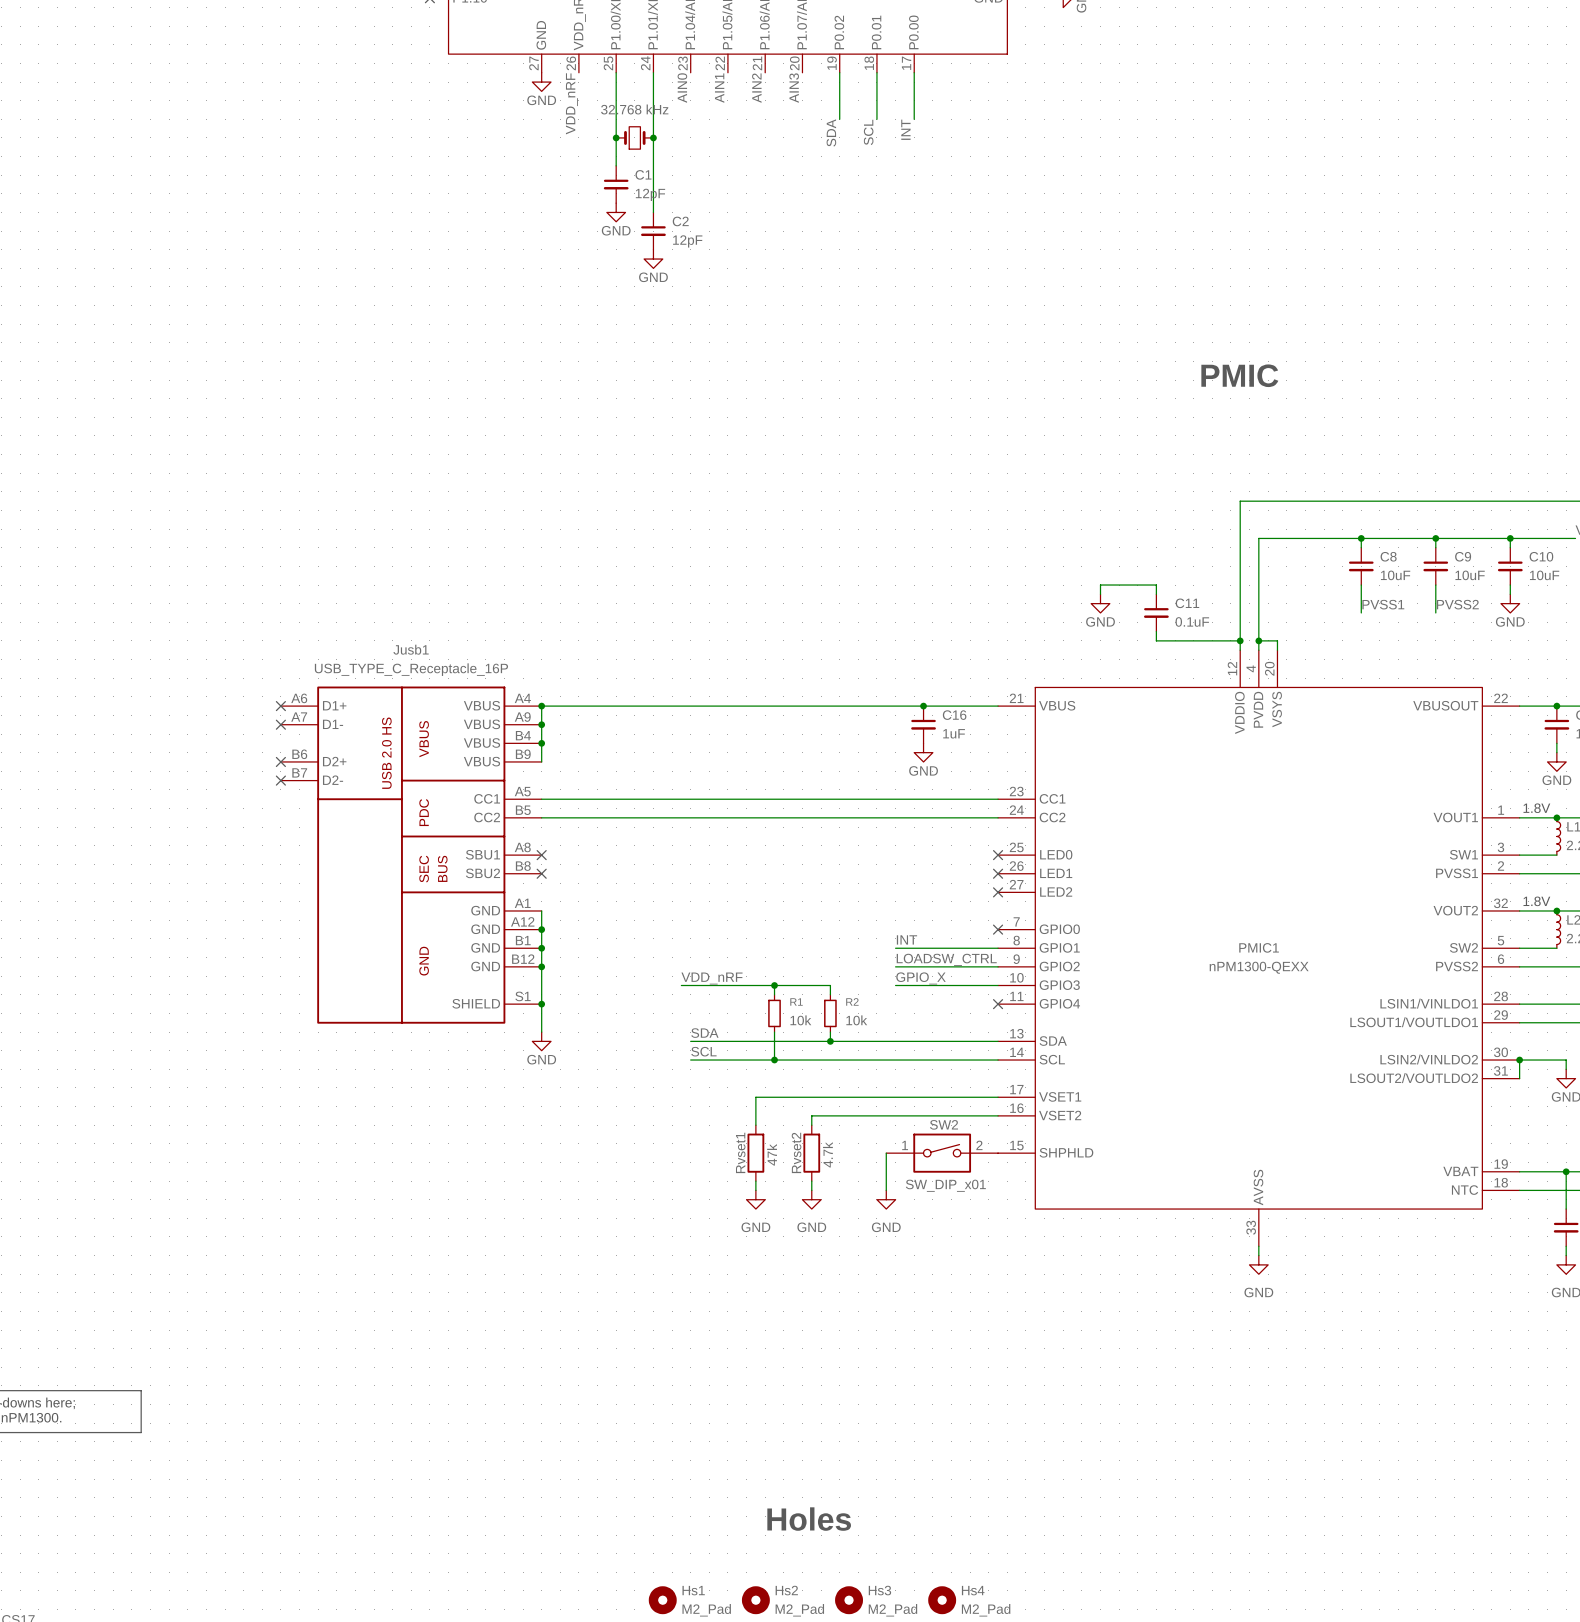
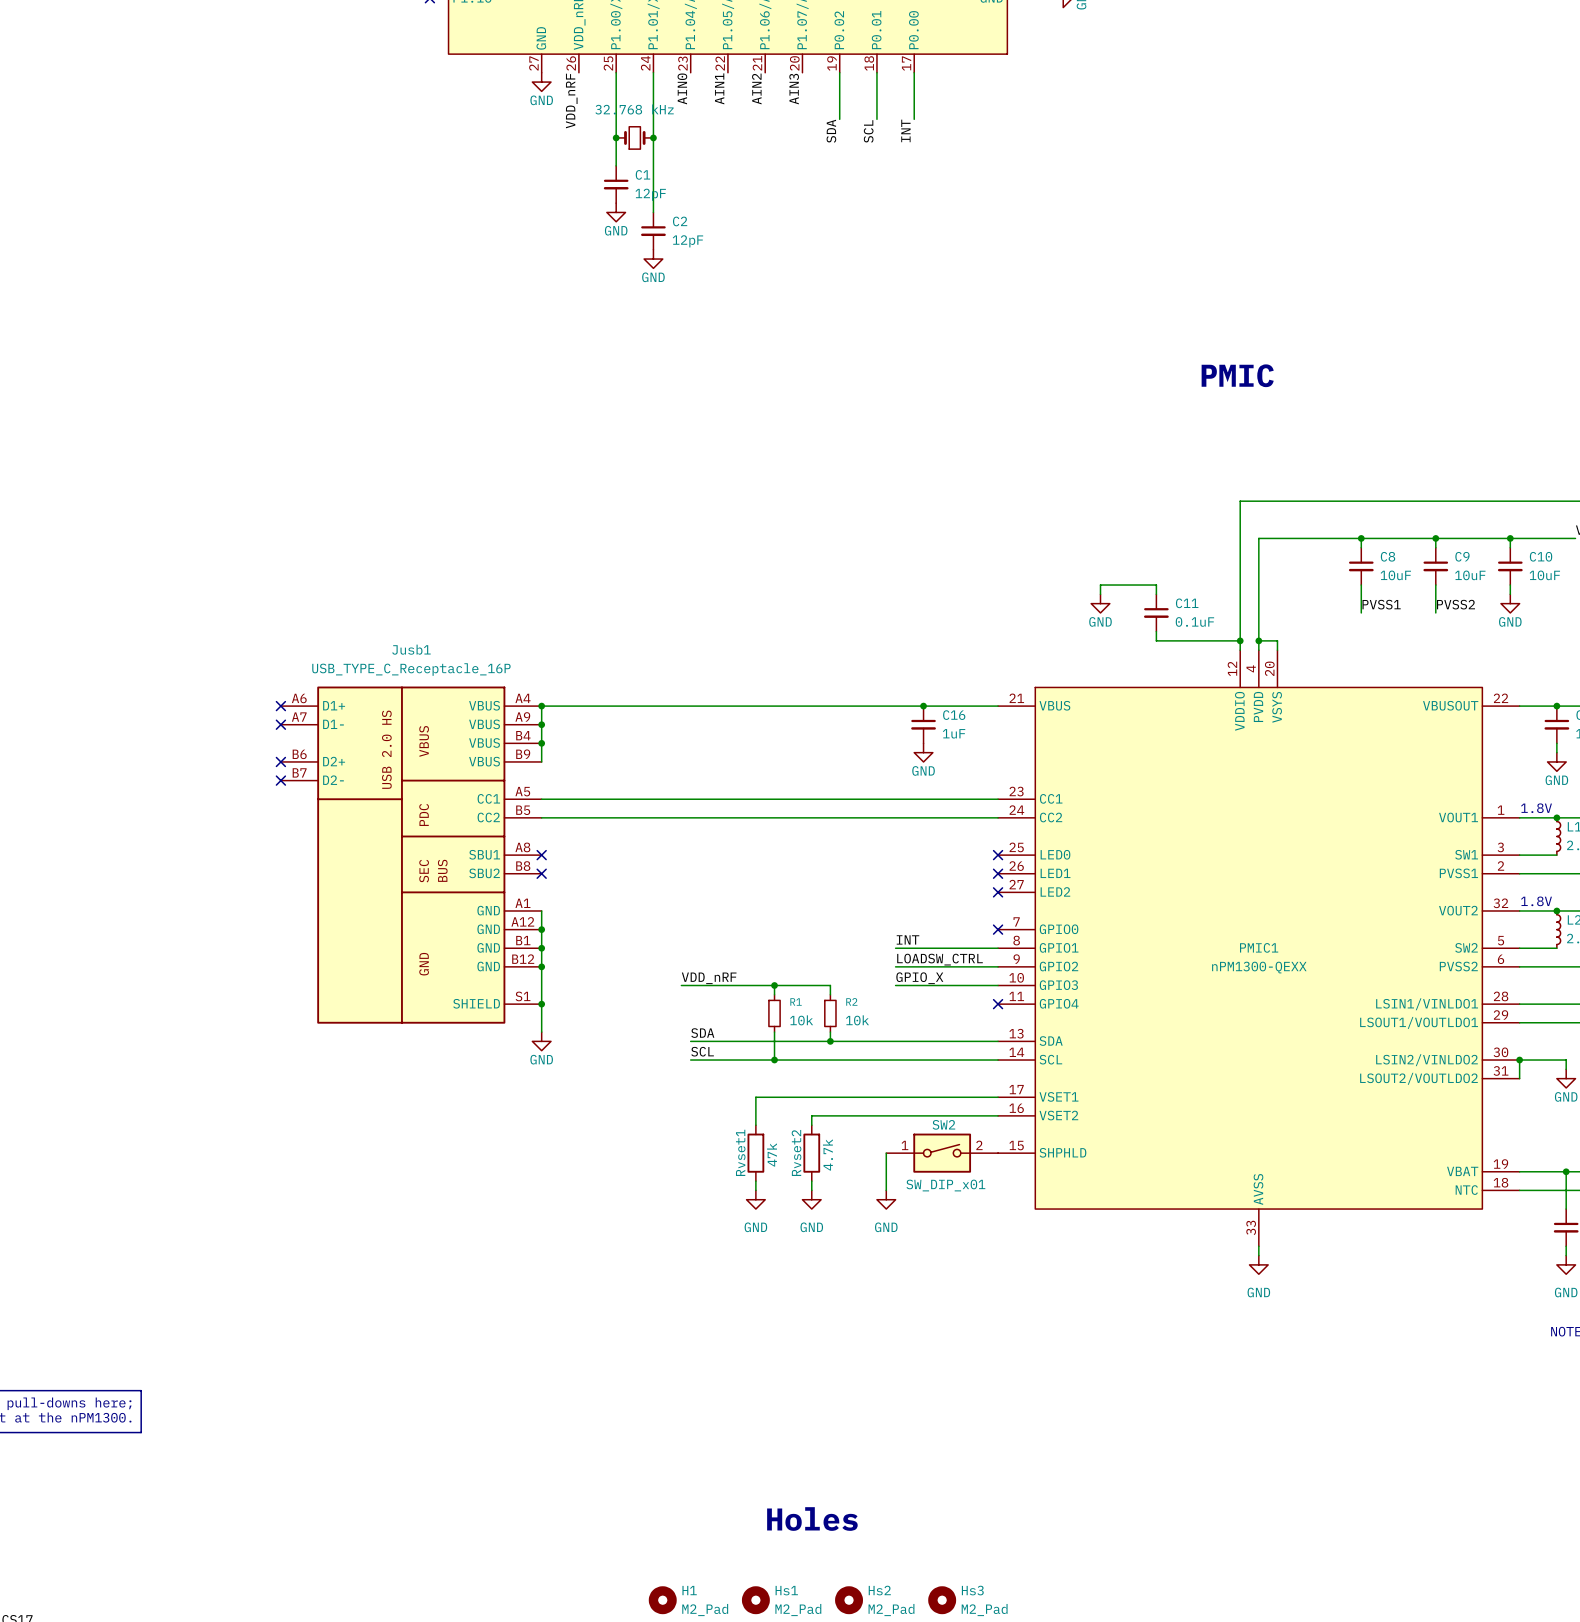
Hs1 name: Hs1 (693, 1590) -> H1 (689, 1590)
Hs2 name: Hs2 (786, 1590) -> Hs1 (786, 1590)
Hs3 name: Hs3 (879, 1590) -> Hs2 (879, 1590)
Hs4 name: Hs4 (973, 1590) -> Hs3 (972, 1590)

